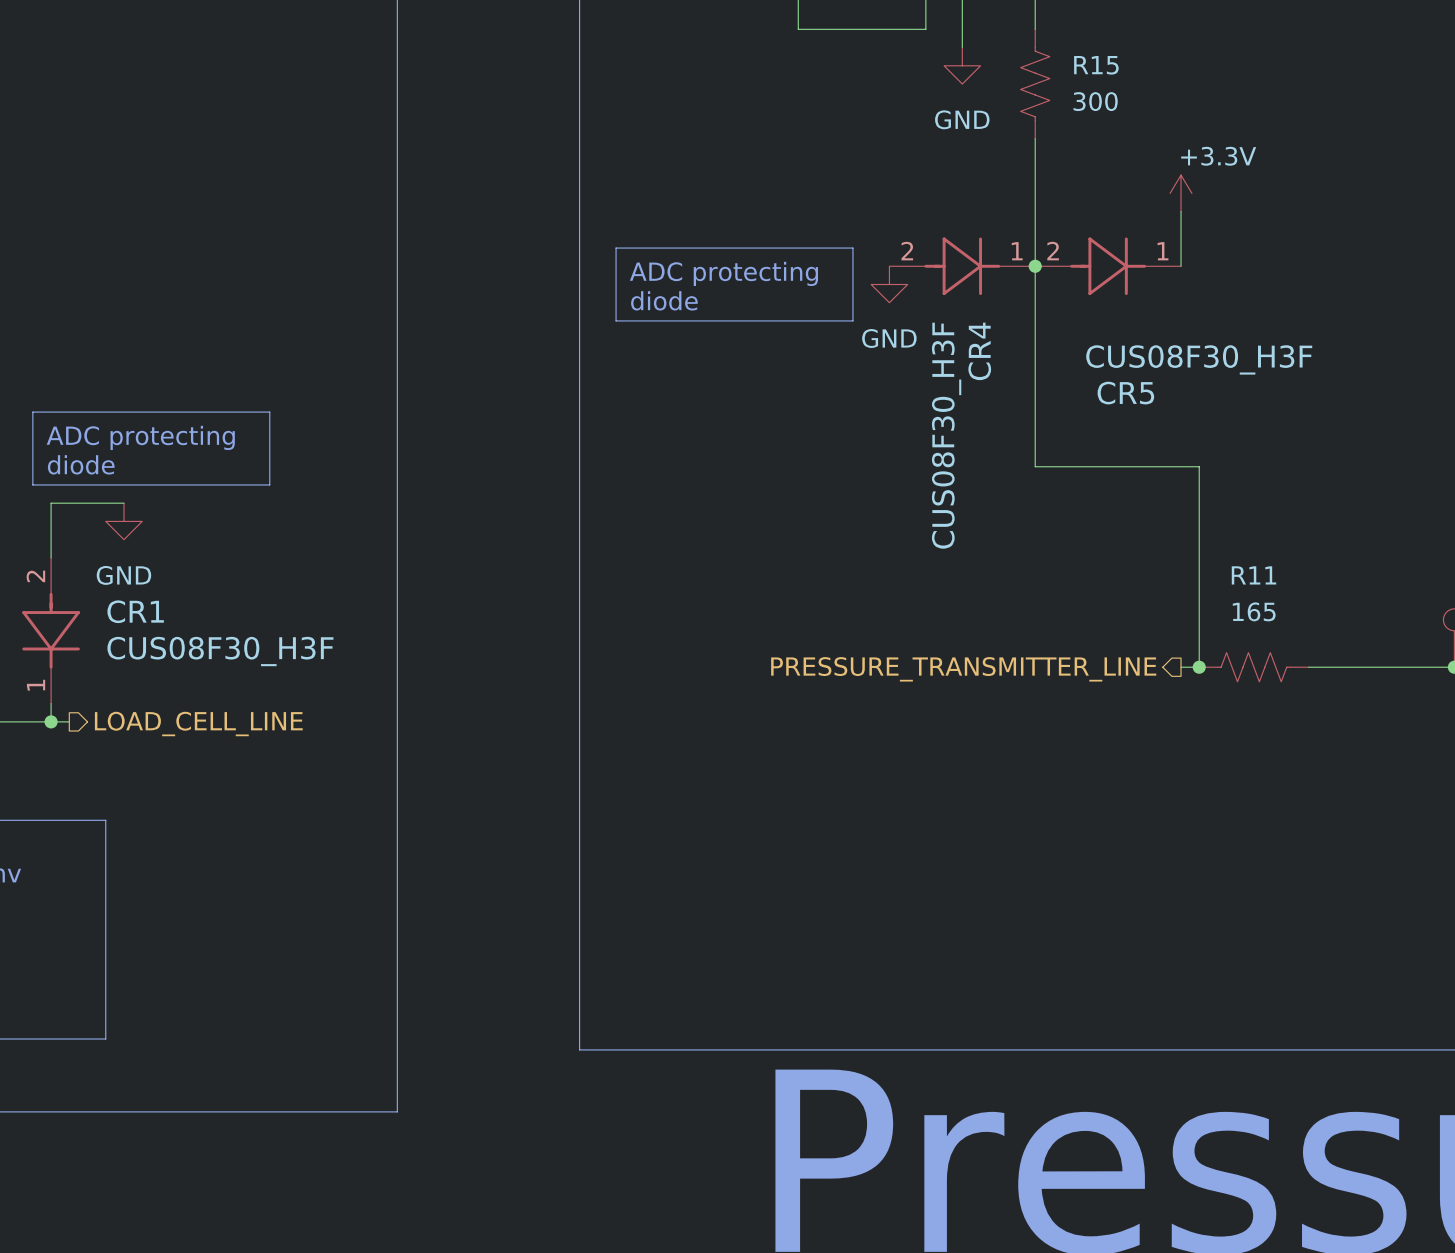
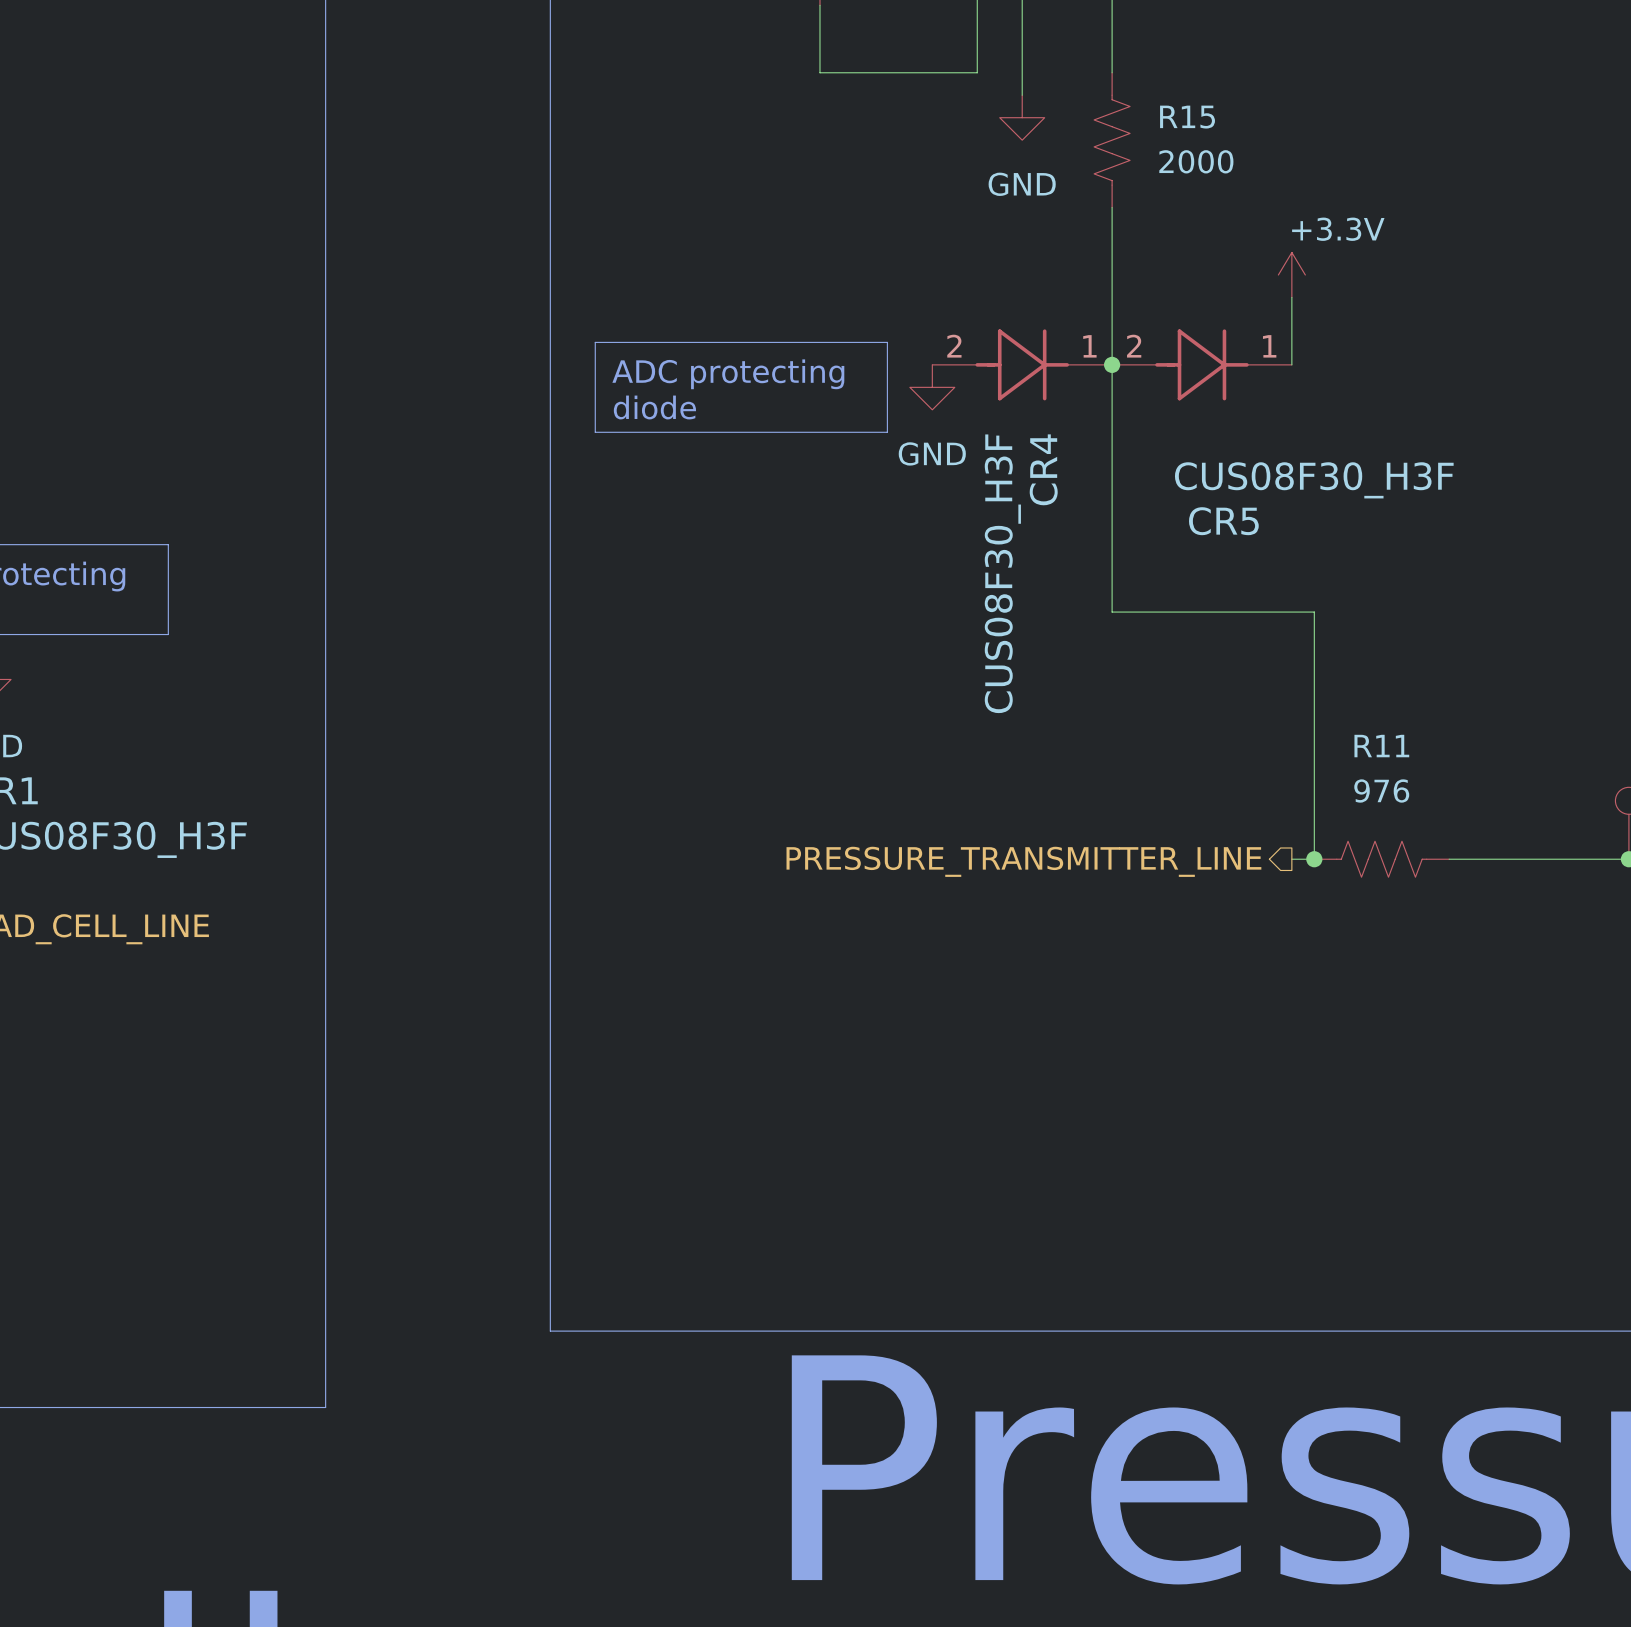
R15 value: 300 (1095, 101) -> 2000 (1196, 161)
R11 value: 165 (1254, 611) -> 976 (1381, 791)

